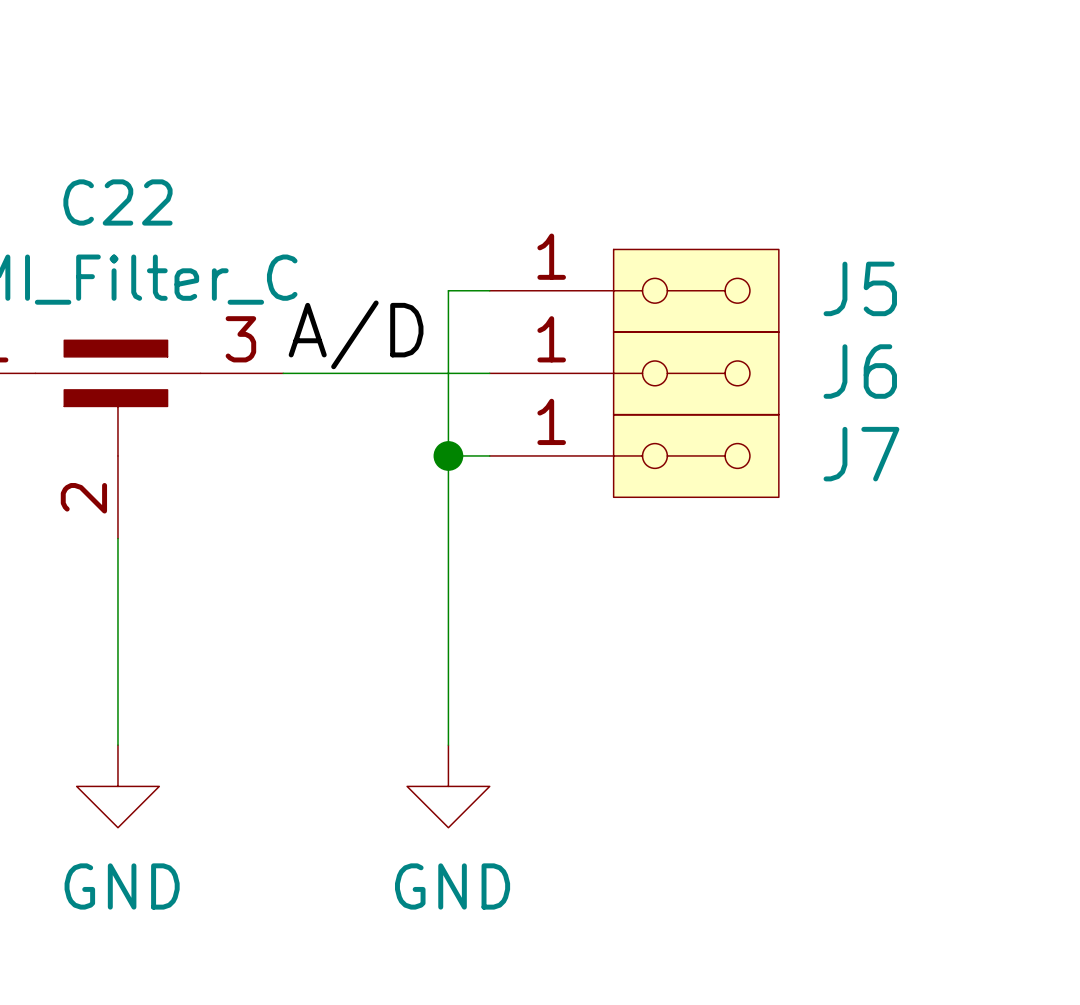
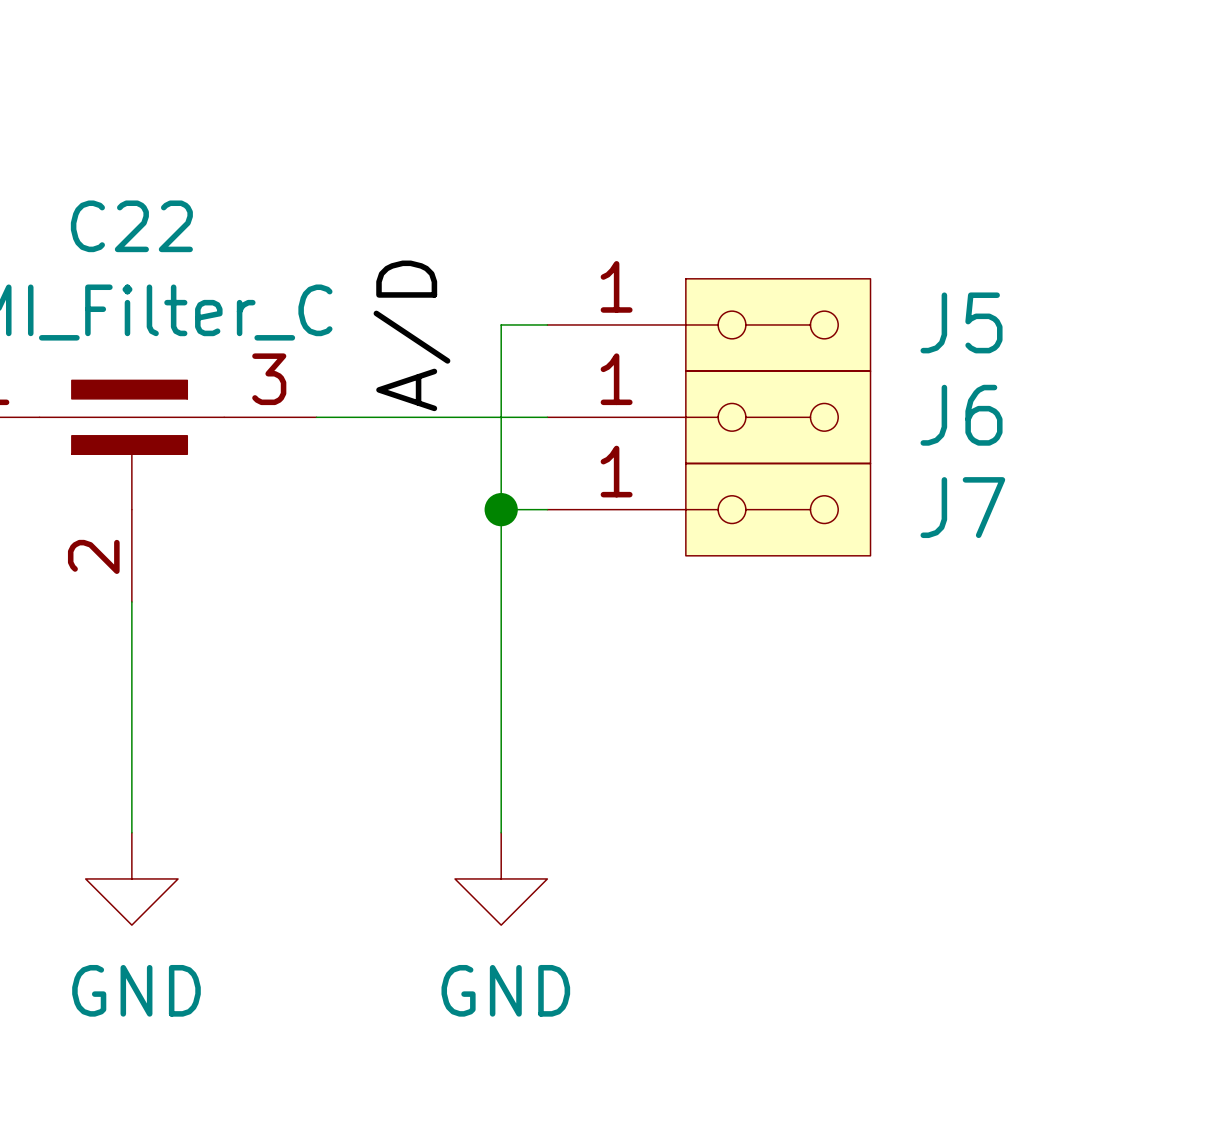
label rotation: 0° (356, 334) -> 90° counterclockwise (411, 335)

